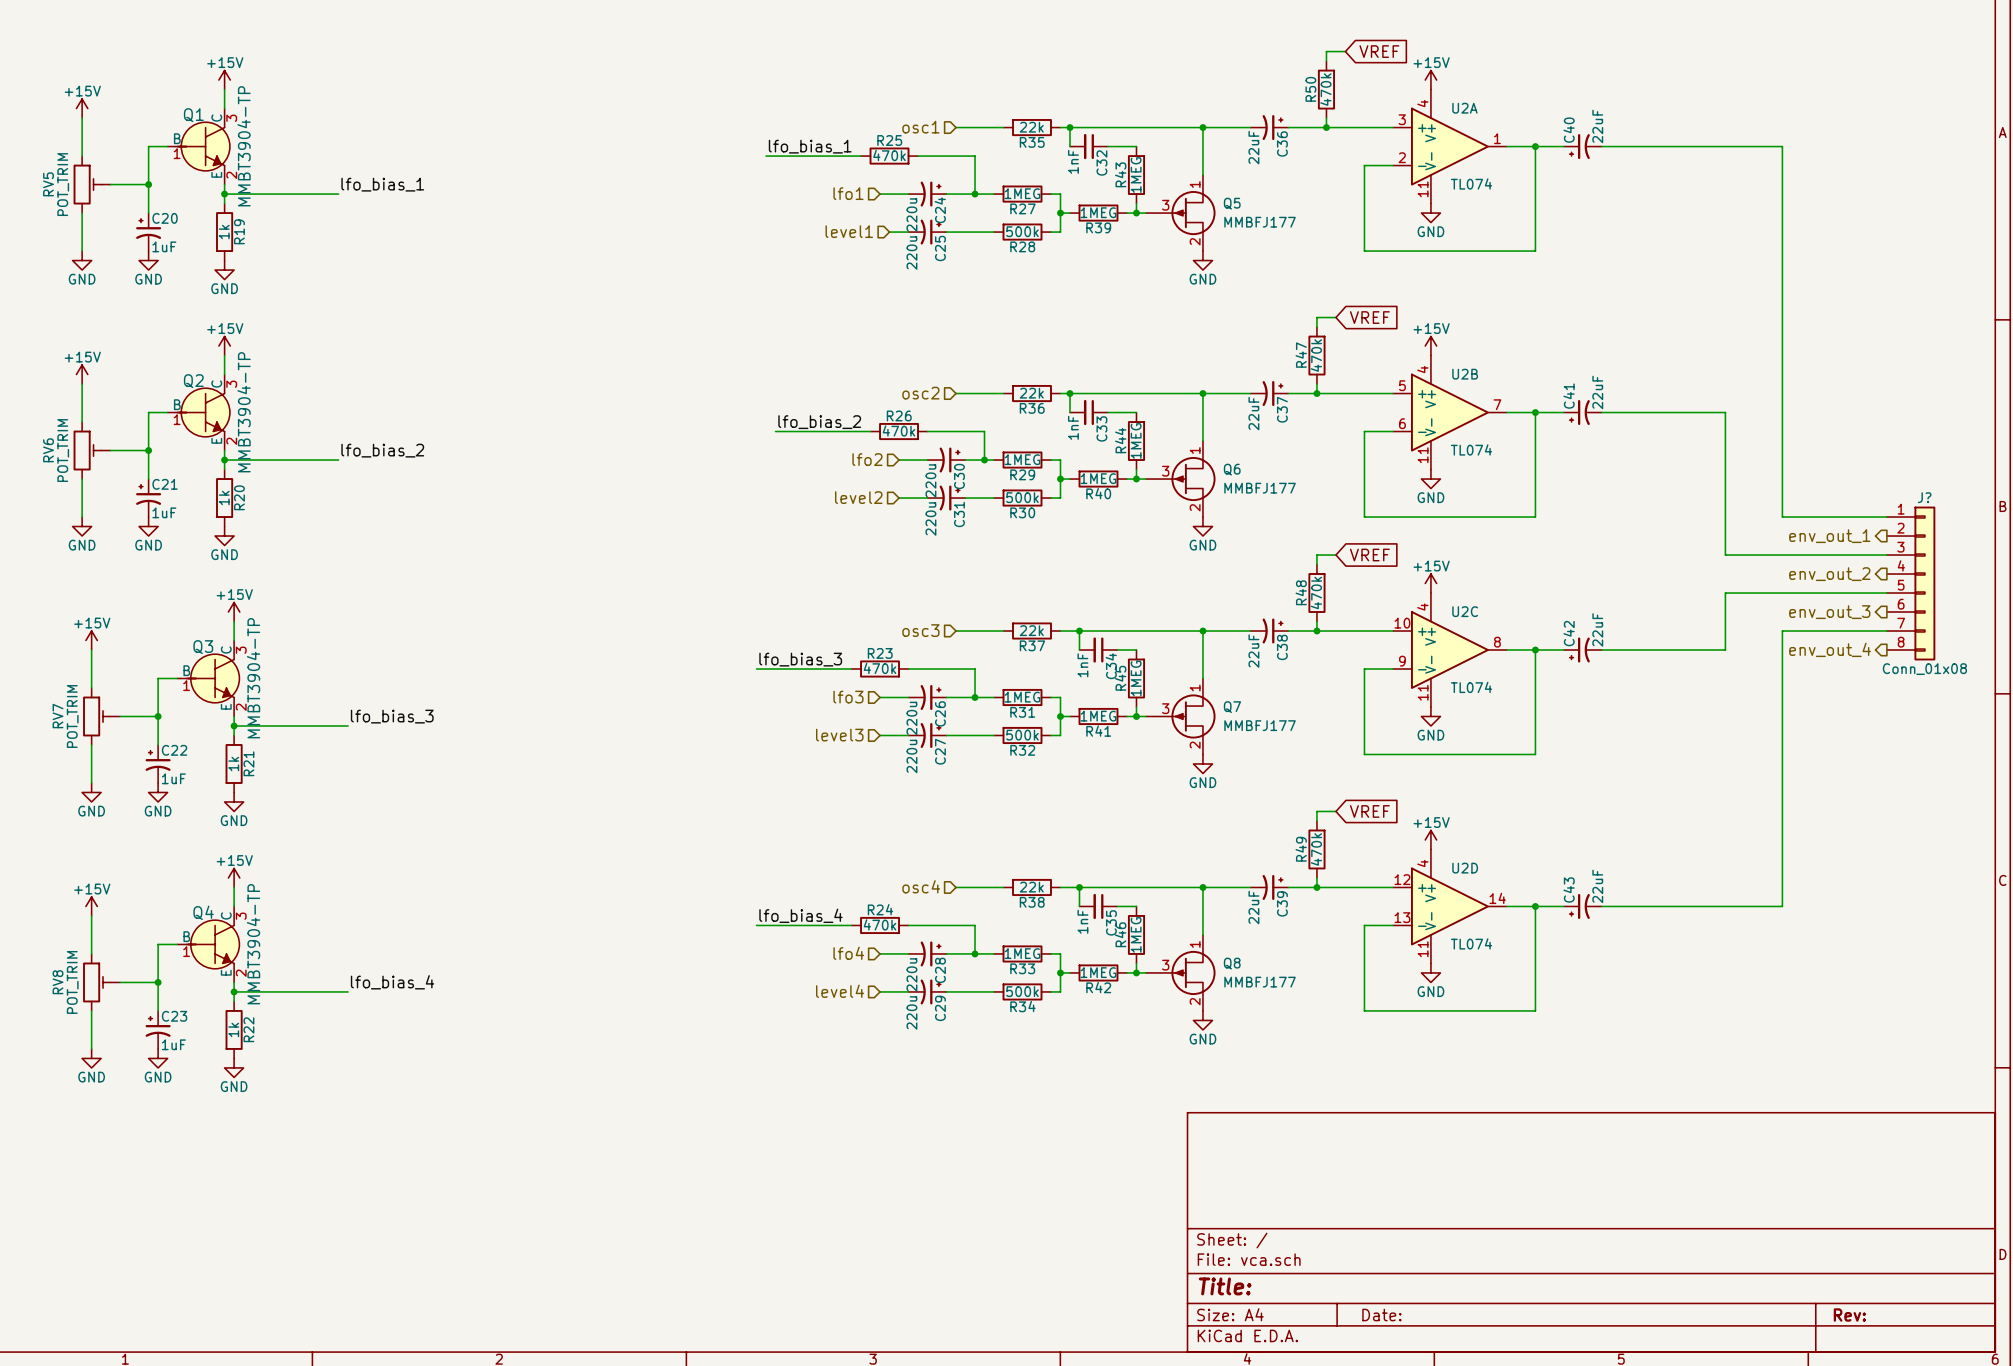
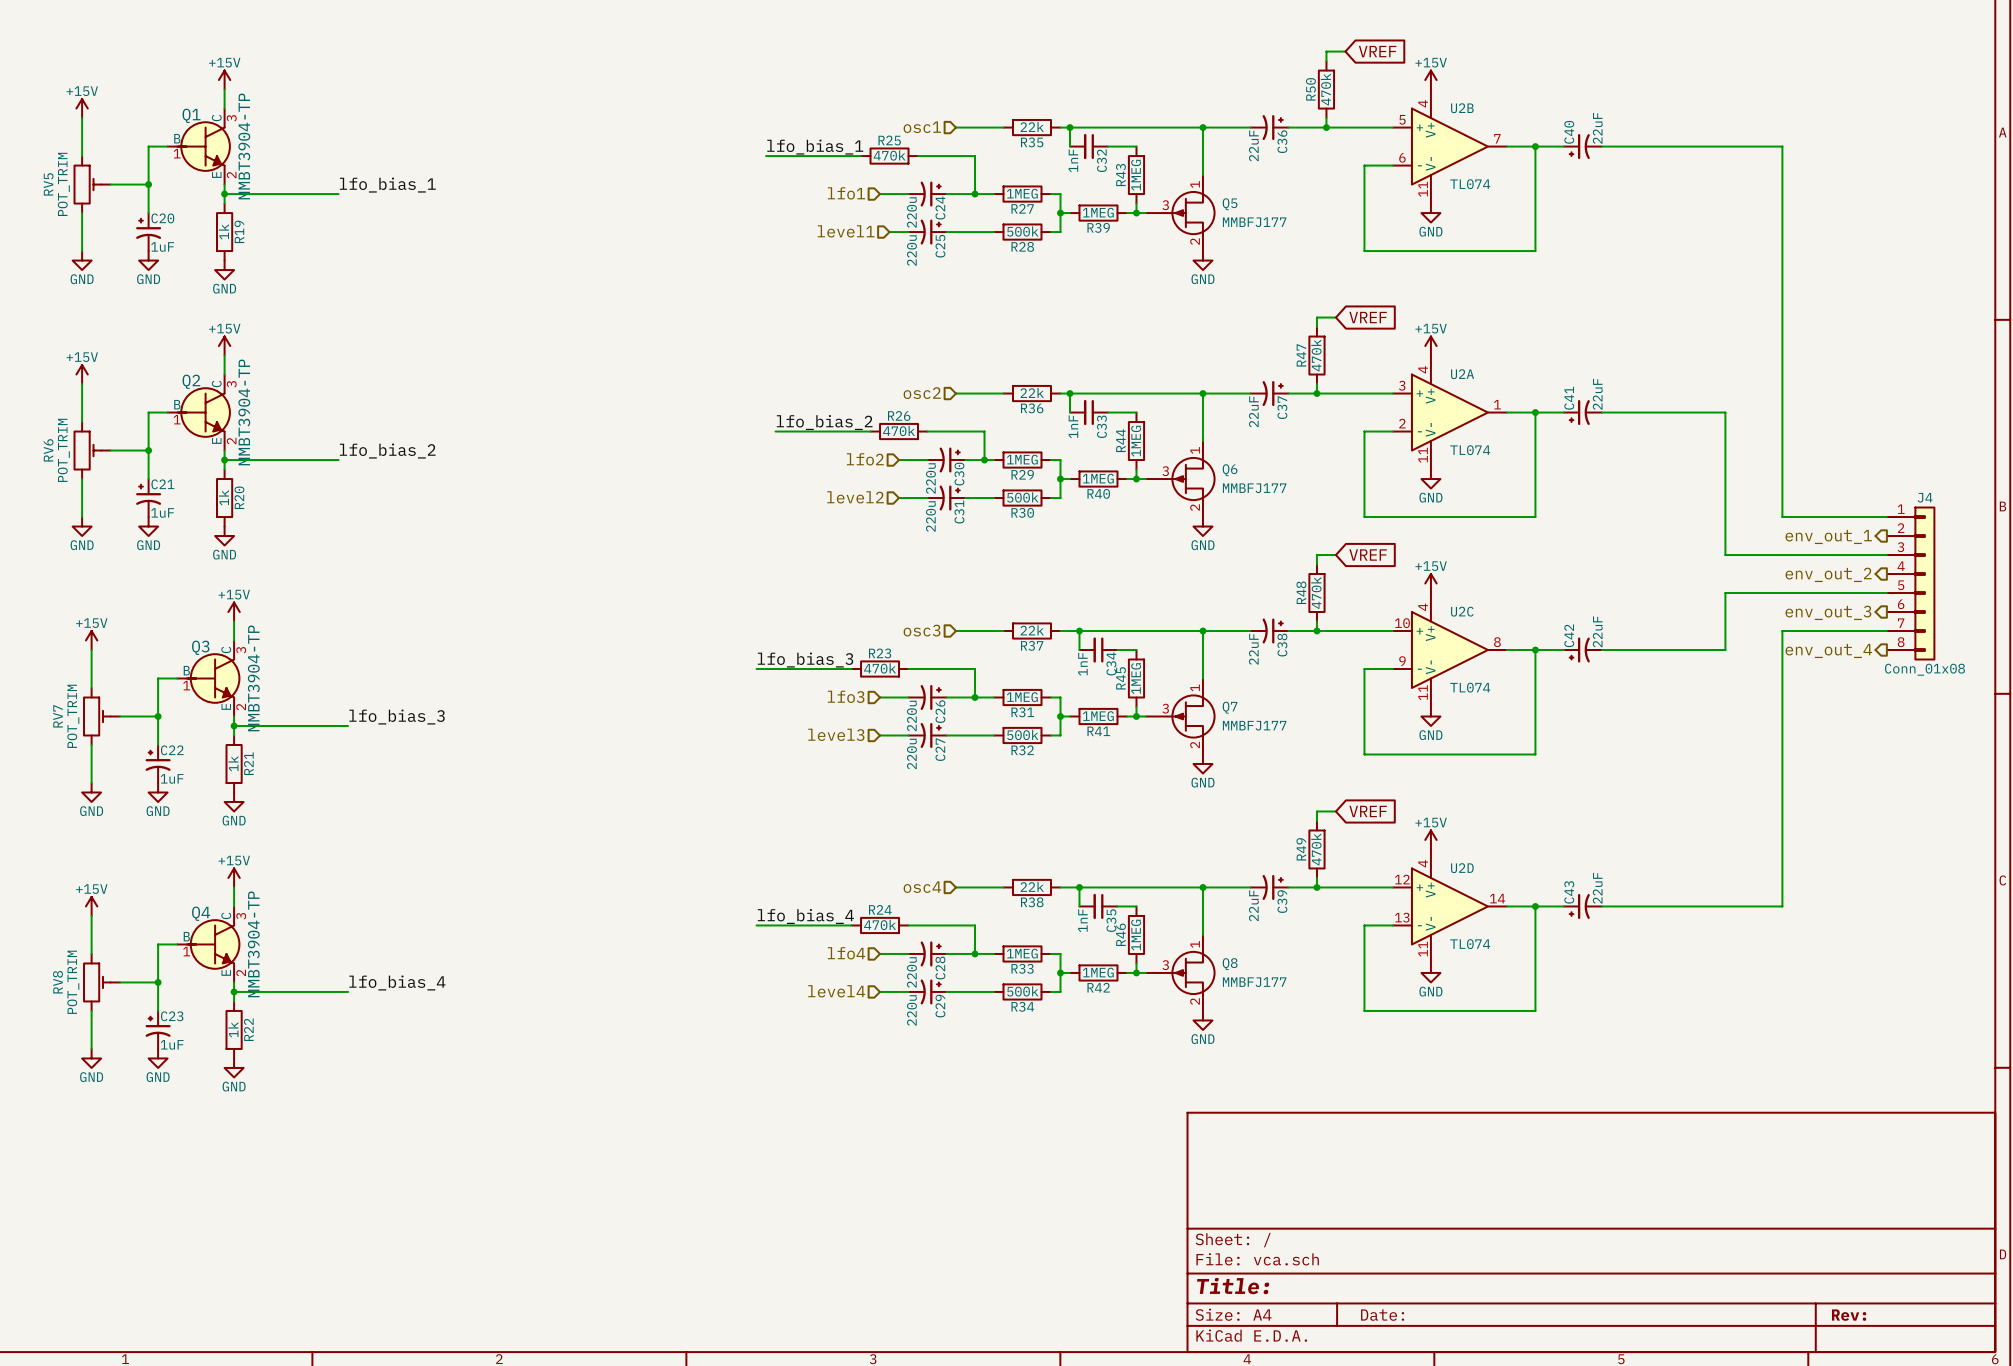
U2A position: (1449, 146) -> (1449, 412)
U2B position: (1449, 412) -> (1449, 146)
J? name: J? (1924, 497) -> J4 (1925, 497)

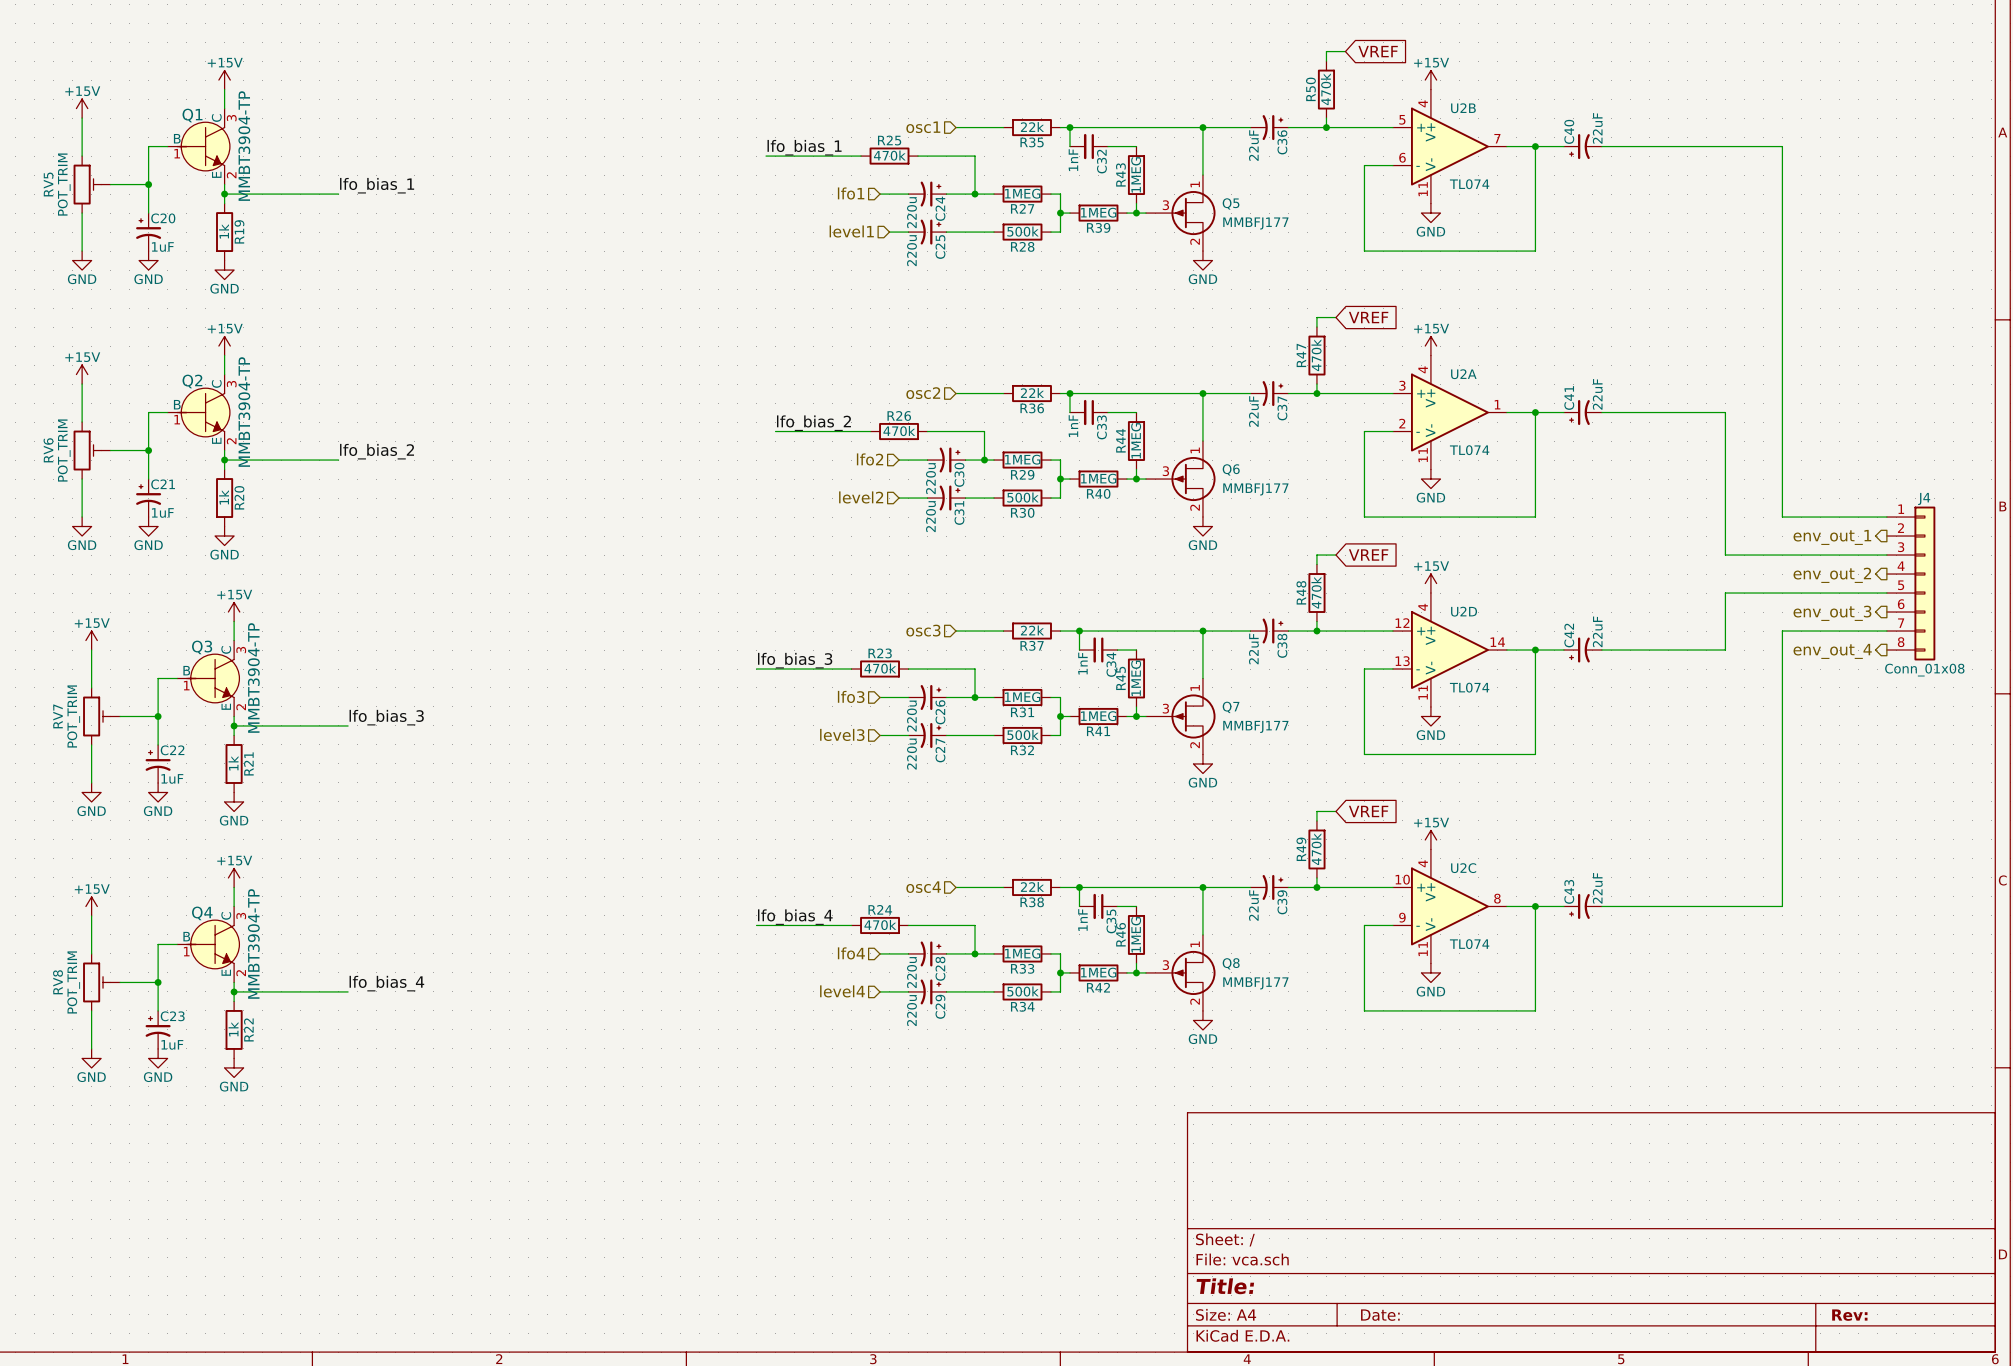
U2C position: (1449, 650) -> (1449, 906)
U2D position: (1449, 906) -> (1449, 650)

